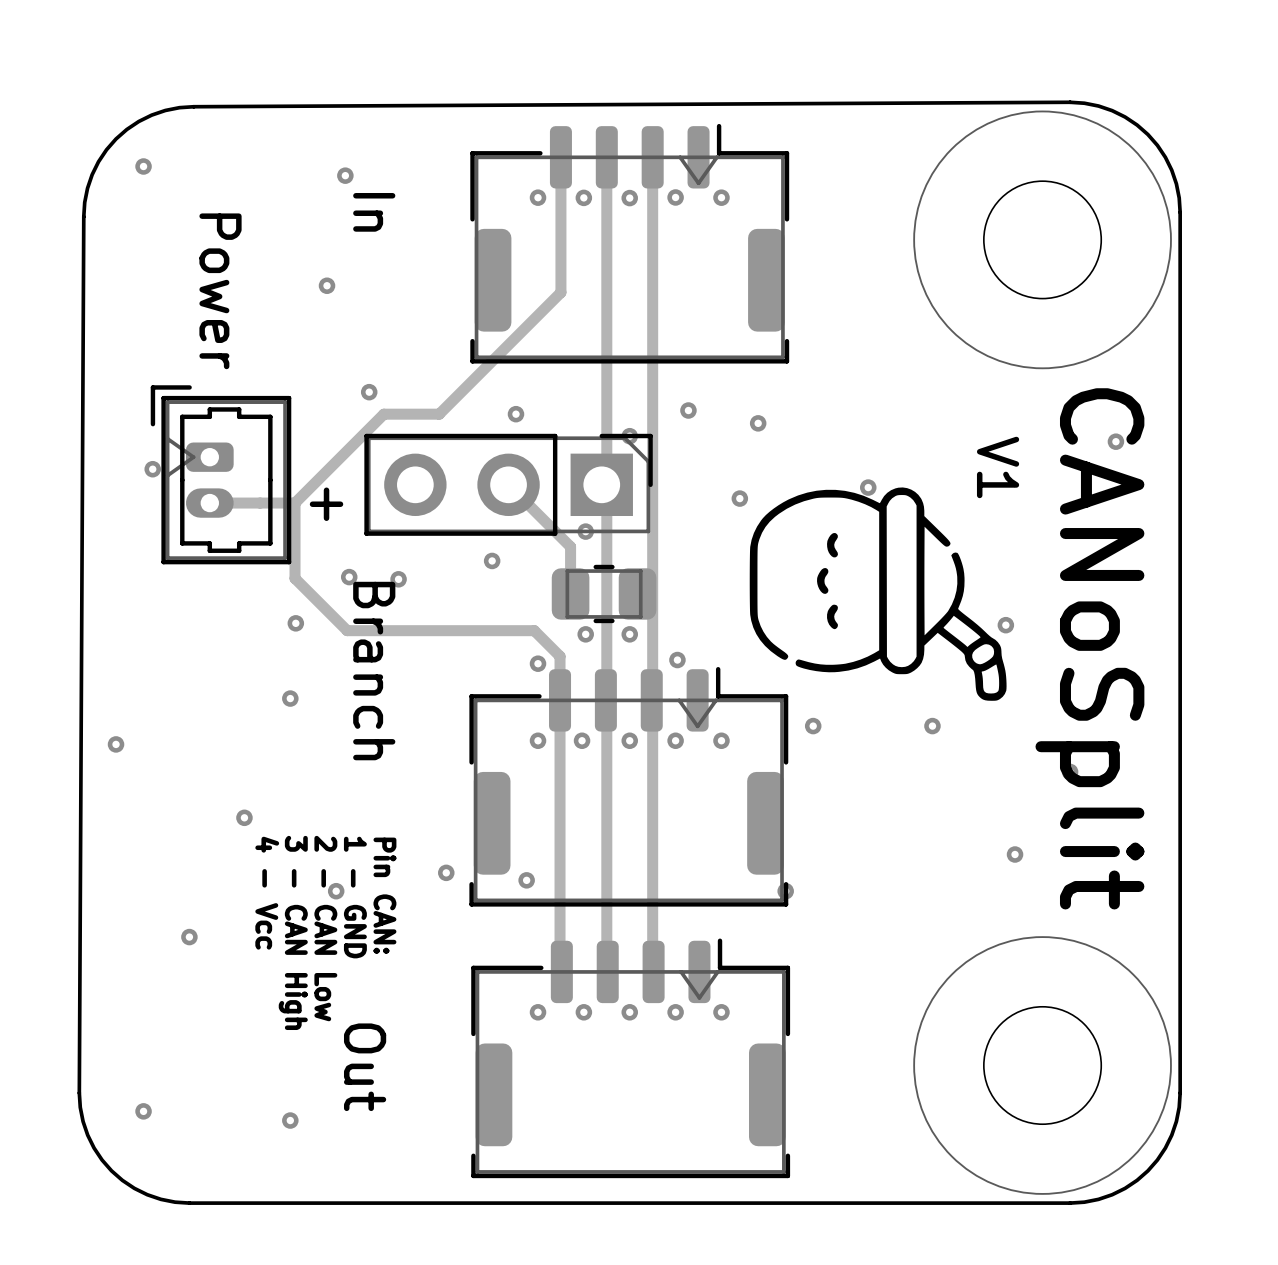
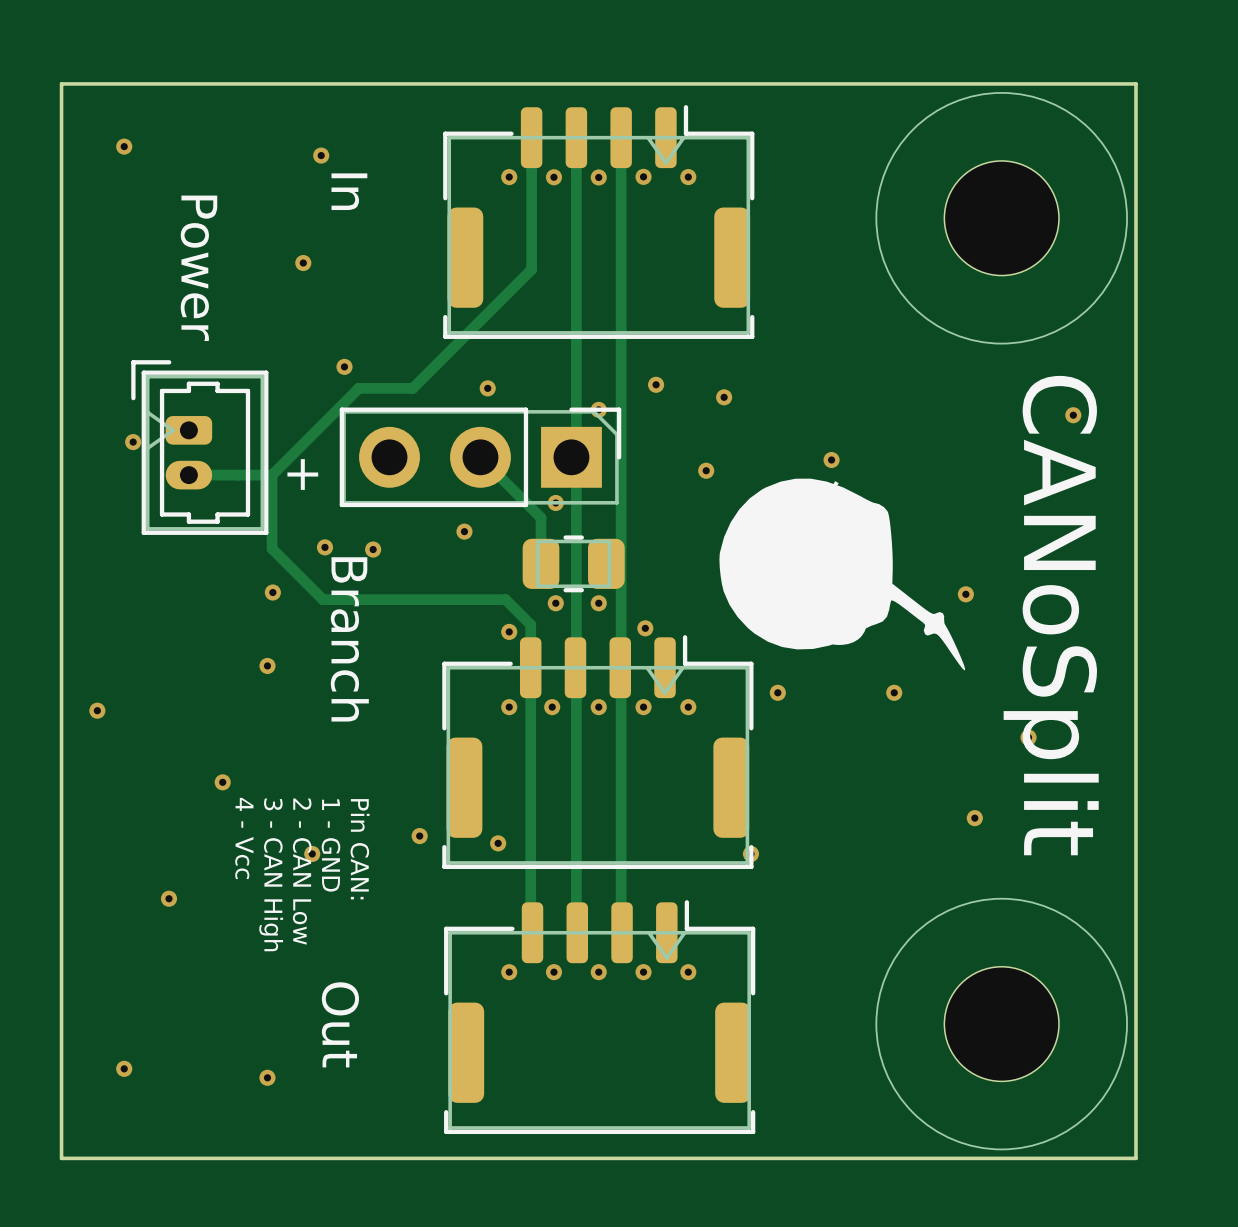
board edge: (1180, 212) (1176, 183) (1171, 170) (1157, 145) (1147, 134) (1137, 125) (1112, 110) (1084, 103) (193, 106) (179, 107) (151, 115) (138, 121) (116, 138) (106, 149) (92, 174) (84, 202) (83, 216) (80, 1107) (87, 1135) (94, 1148) (102, 1160) (122, 1180) (134, 1188) (160, 1199) (189, 1203) -> (1135, 191) (1135, 83) (61, 83) (61, 1158) (168, 1158)
text: V1 (998, 467) -> none
drawing: [749, 487, 1007, 701] -> none
part: none -> (842, 574)
board edge: (1180, 1093) (1176, 1121) (1171, 1135) (1157, 1160) (1147, 1170) (1137, 1180) (1112, 1194) (1098, 1199) (1070, 1203) -> (1135, 1050) (1135, 1158) (1028, 1158)

